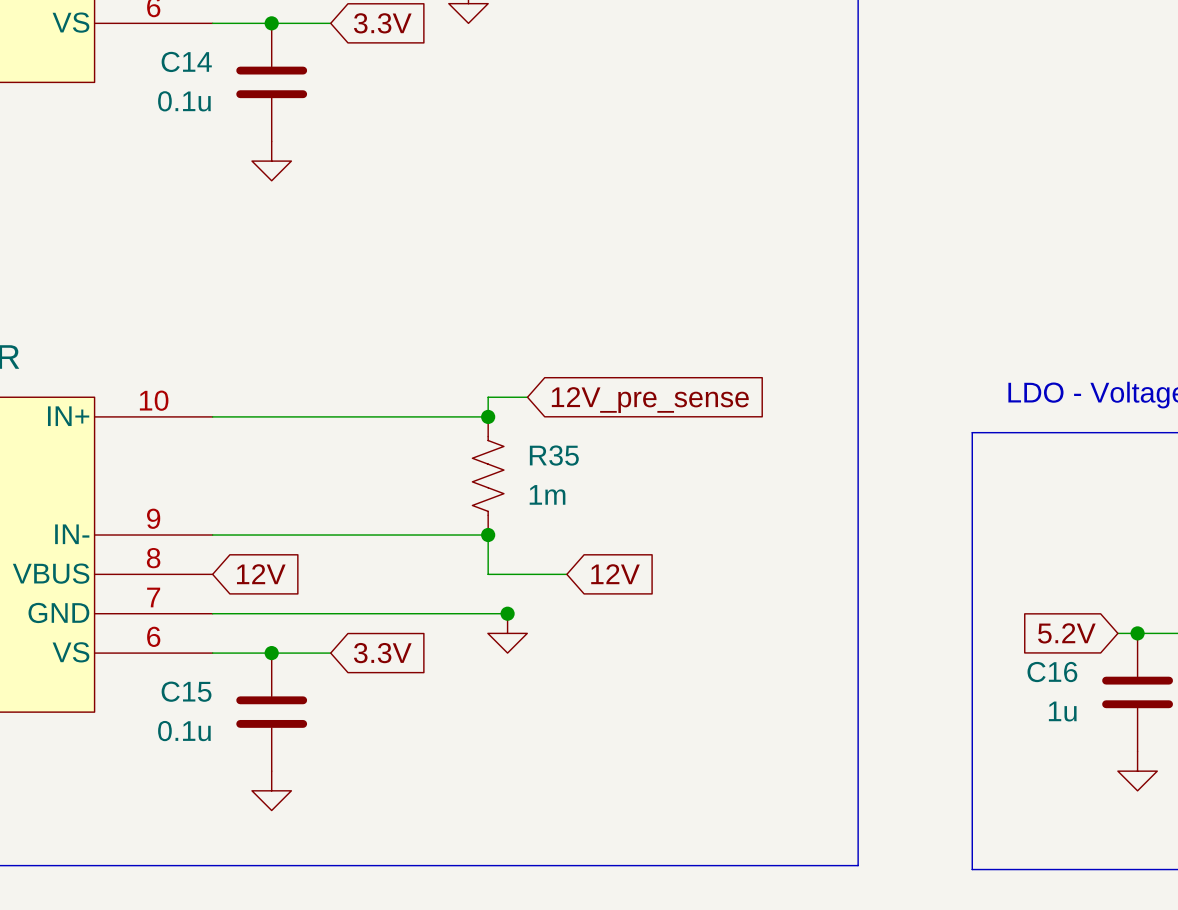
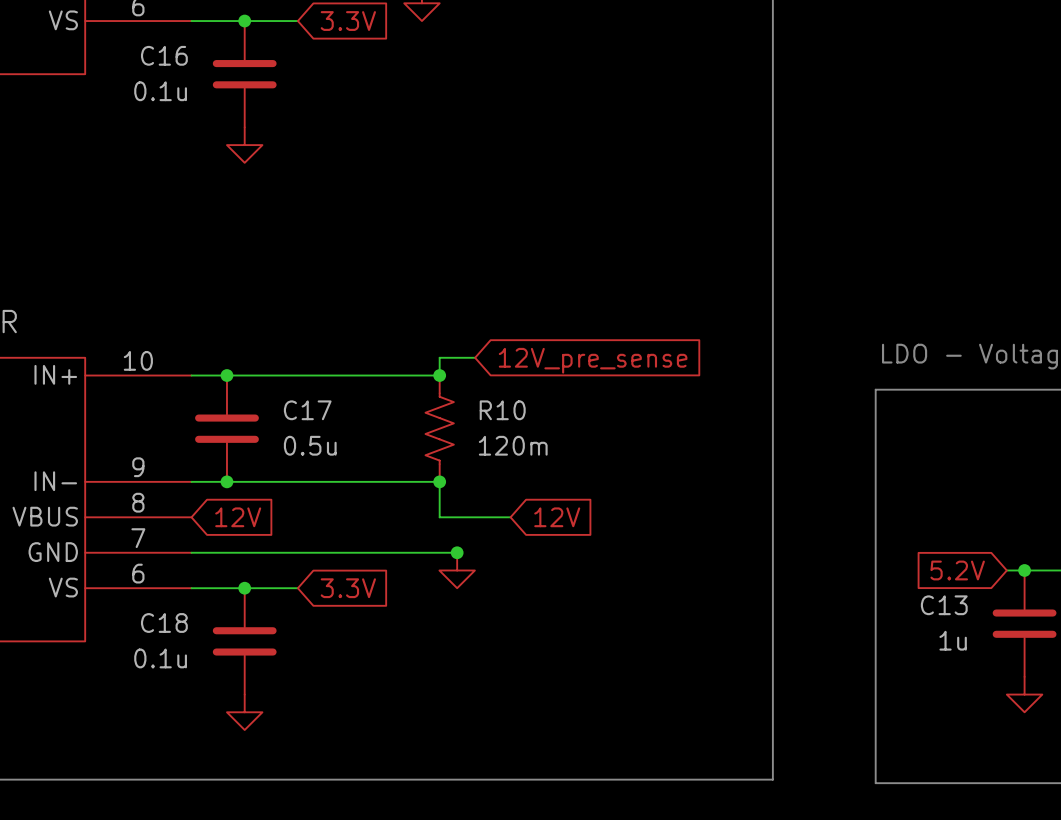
C14 name: C14 (186, 61) -> C16 (164, 55)
junction: none -> (226, 375)
R35 name: R35 (554, 455) -> R10 (502, 410)
C17: none -> 0.5u (226, 428)
R35 value: 1m (547, 494) -> 120m (513, 445)
junction: none -> (226, 481)
C16 name: C16 (1052, 672) -> C13 (944, 605)
C15 name: C15 (186, 691) -> C18 (164, 622)

